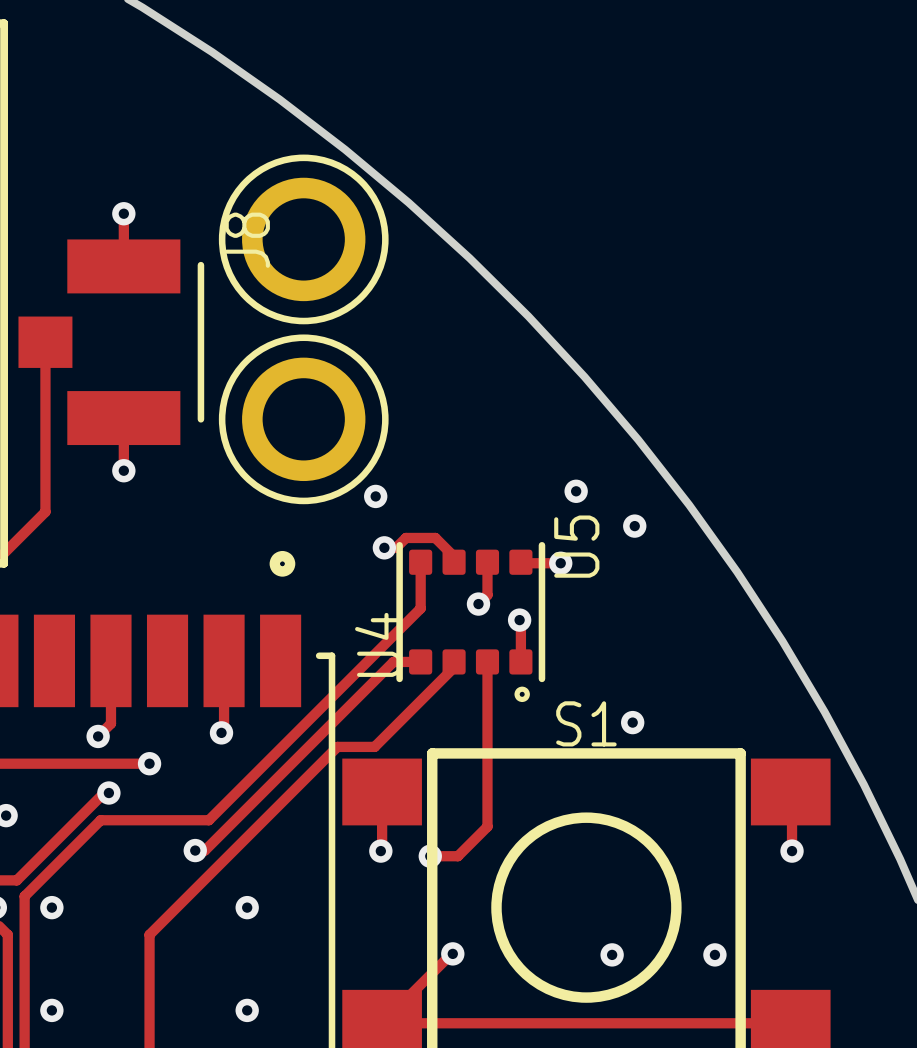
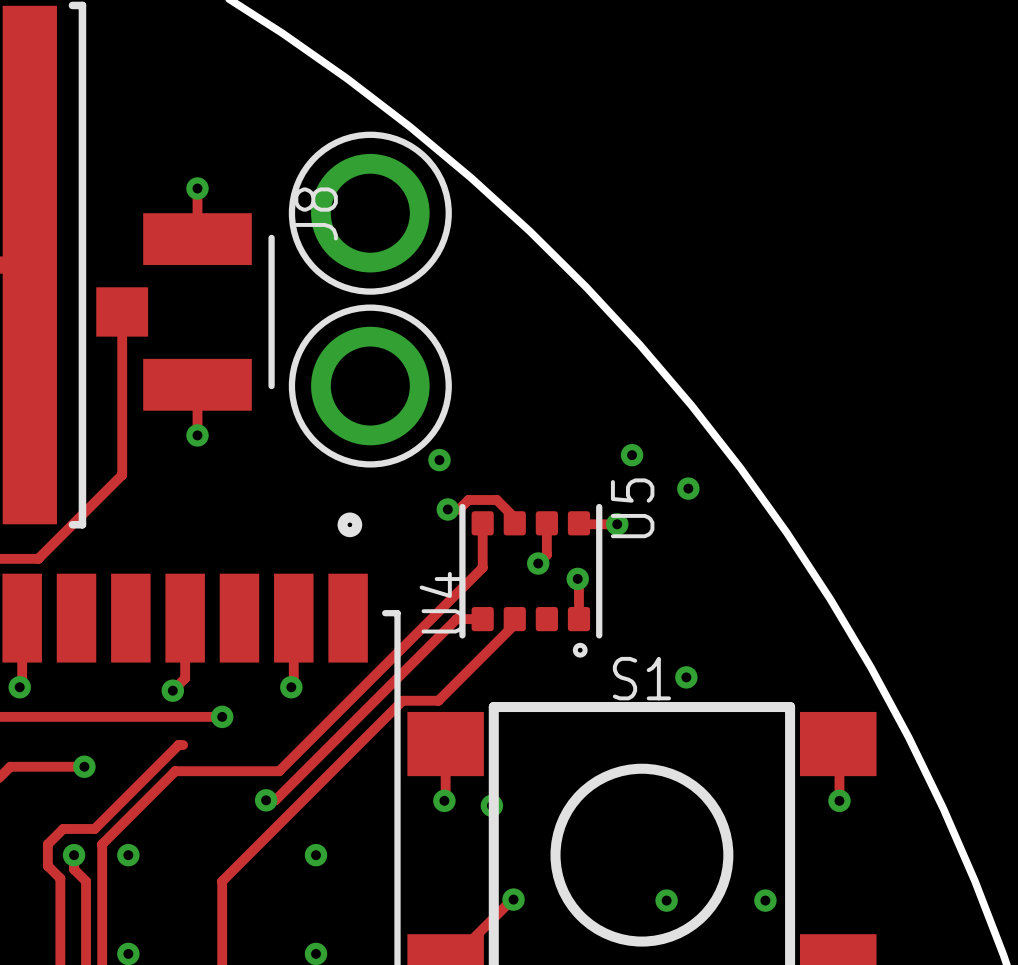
track: (487, 661) (487, 826) (457, 856) (430, 856) -> none
via: (108, 793) -> none

